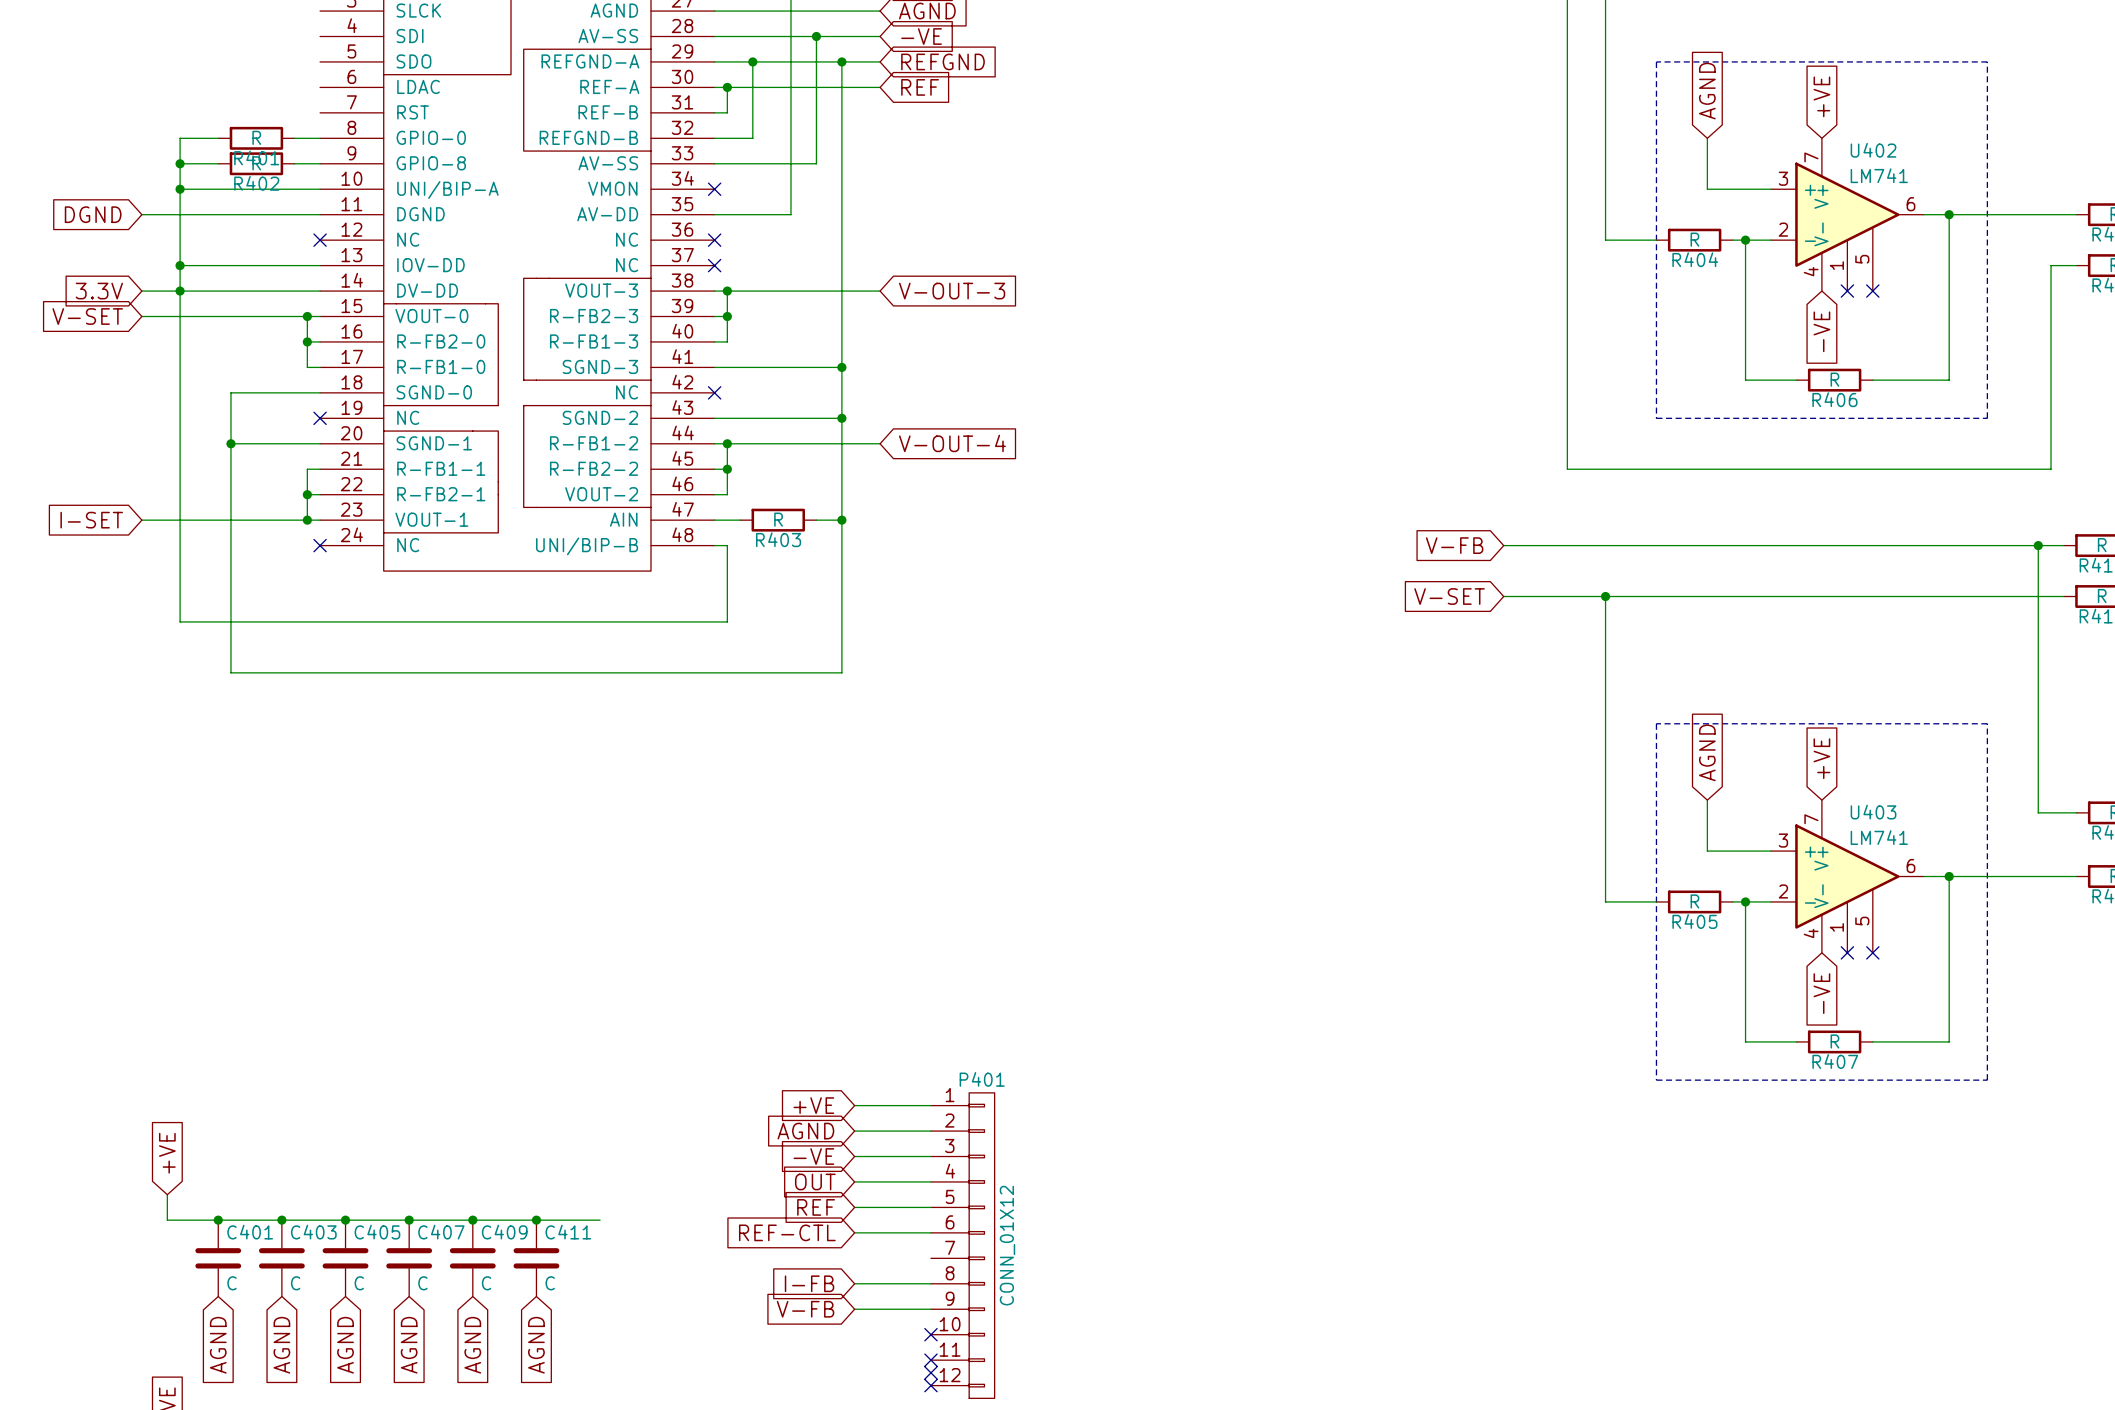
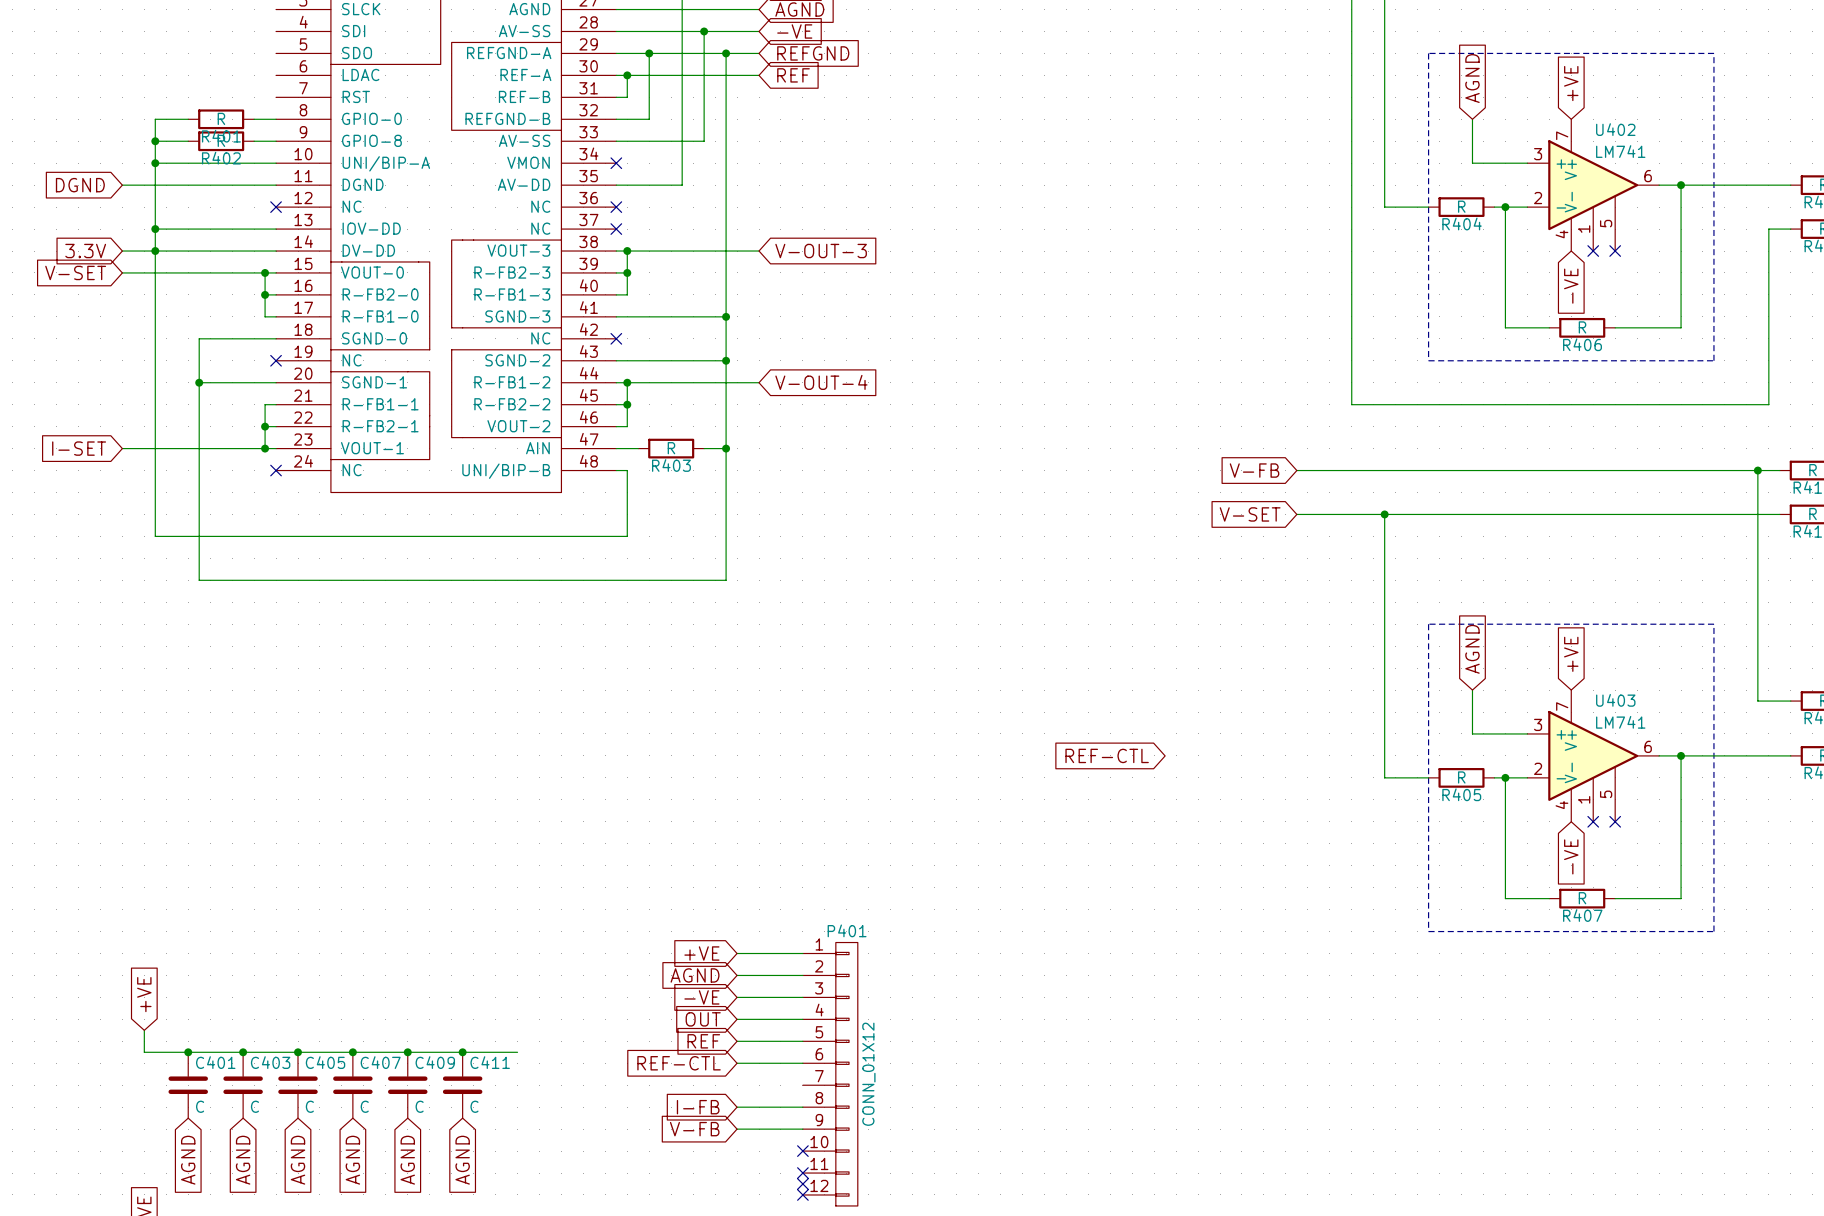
global label: none -> REF-CTL (1107, 755)

